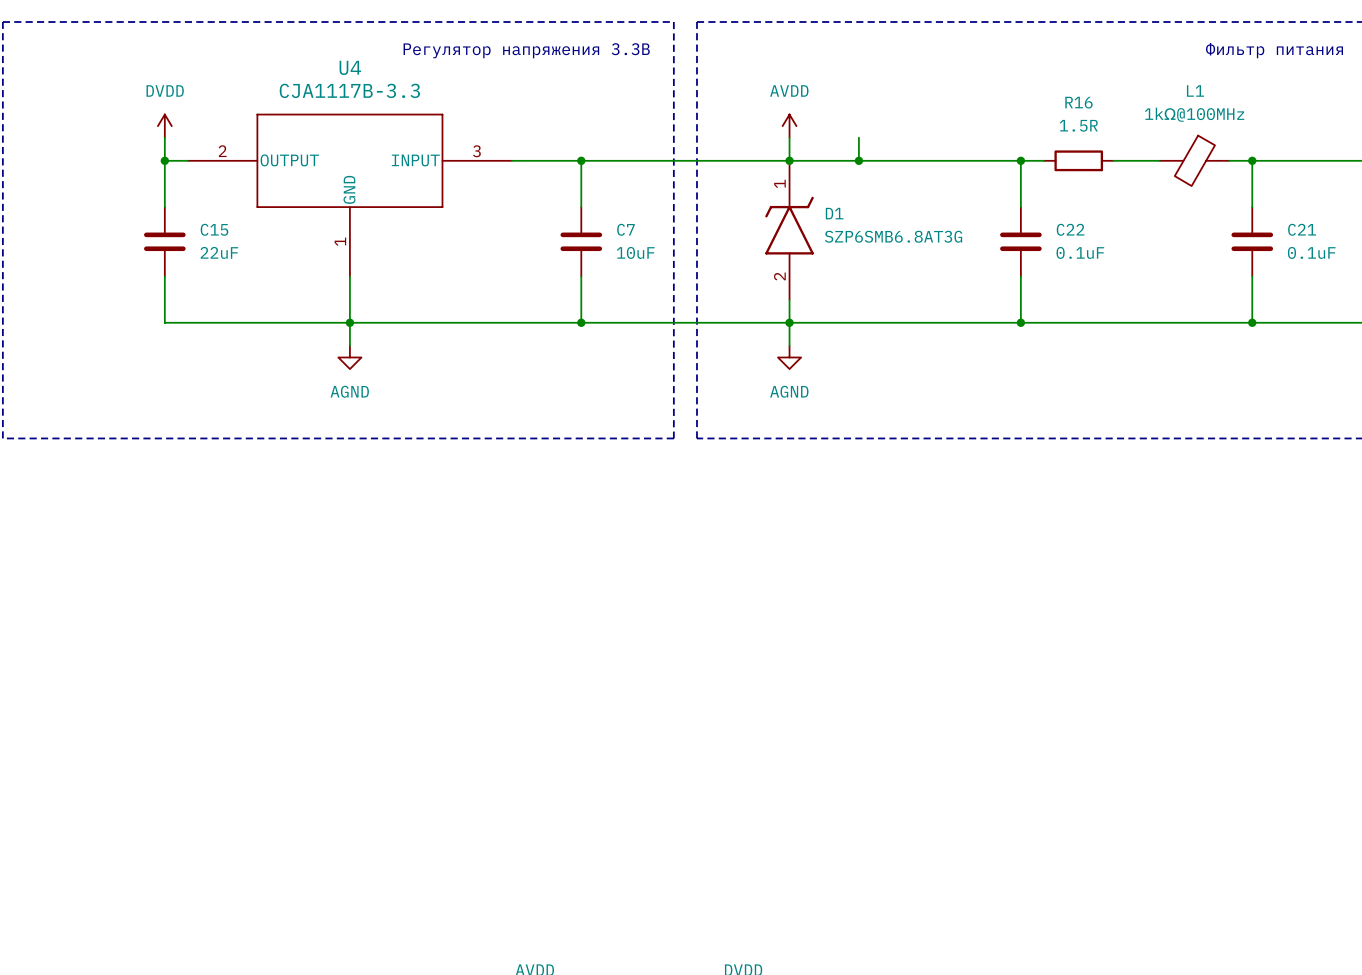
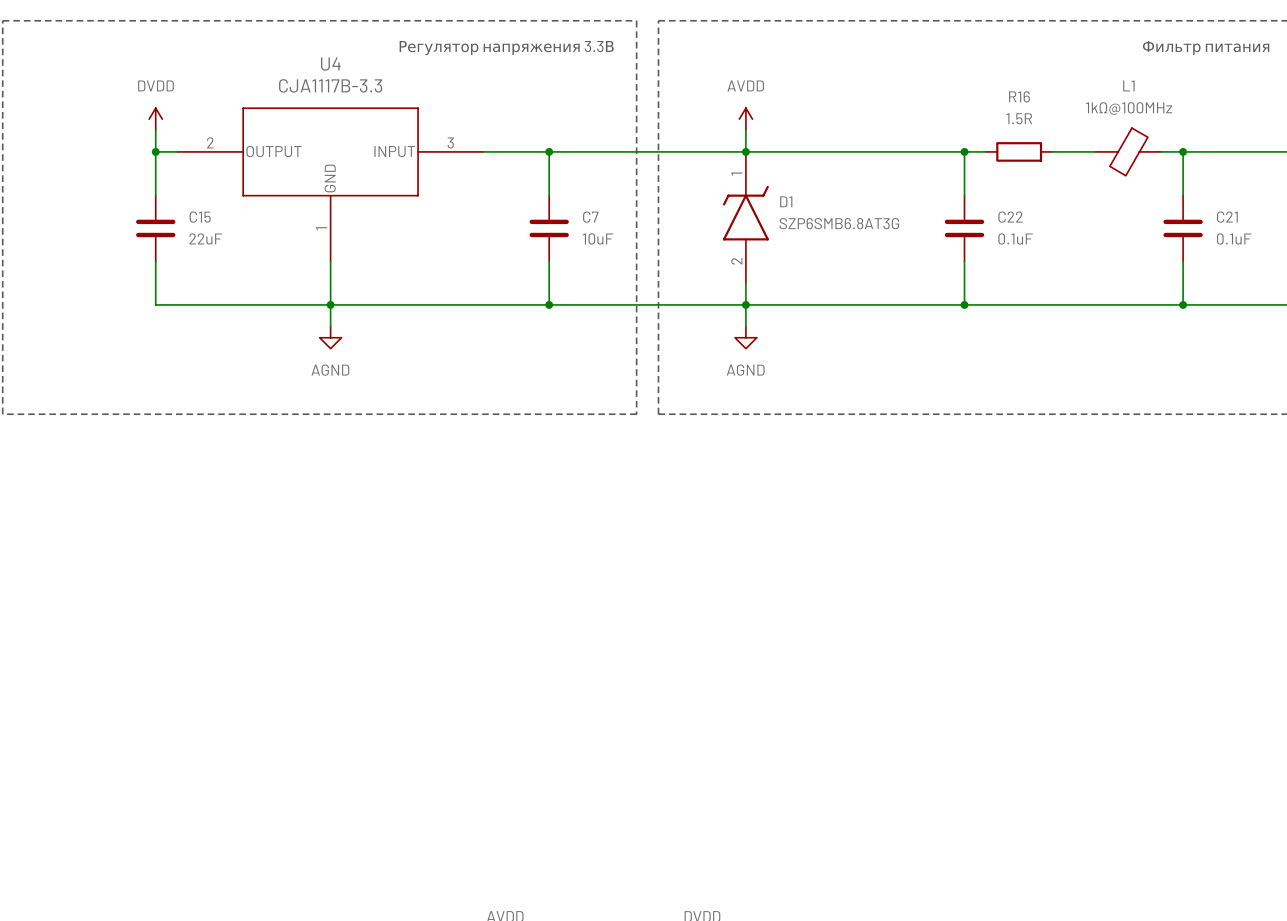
wire: (858, 137) (858, 160) -> none
junction: (858, 160) -> none

